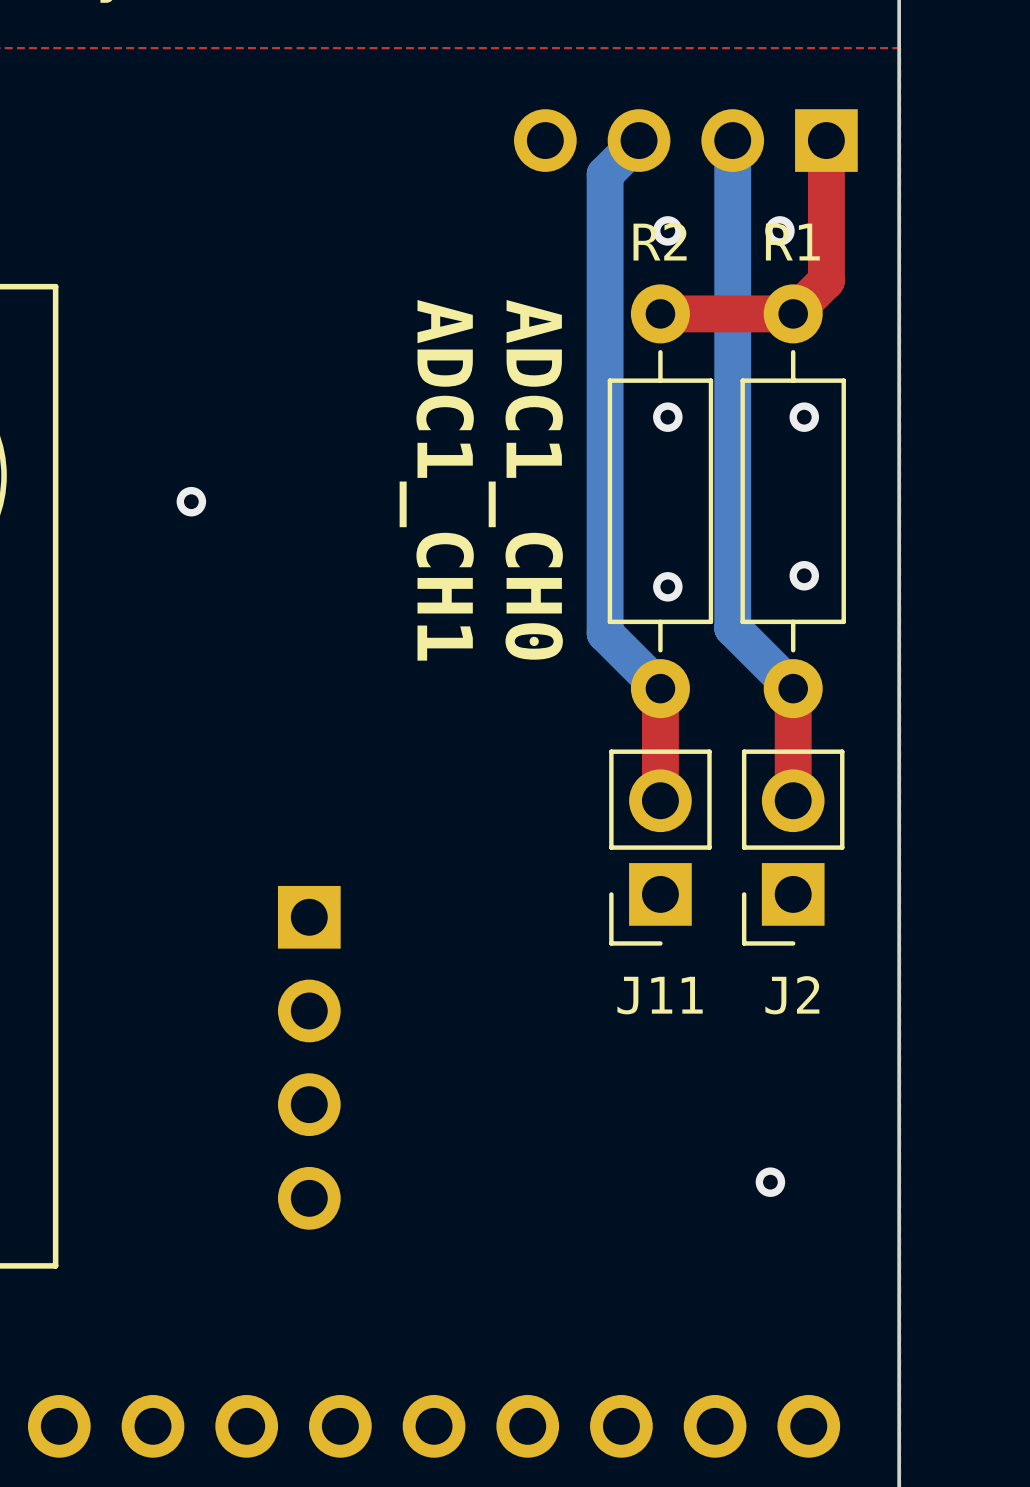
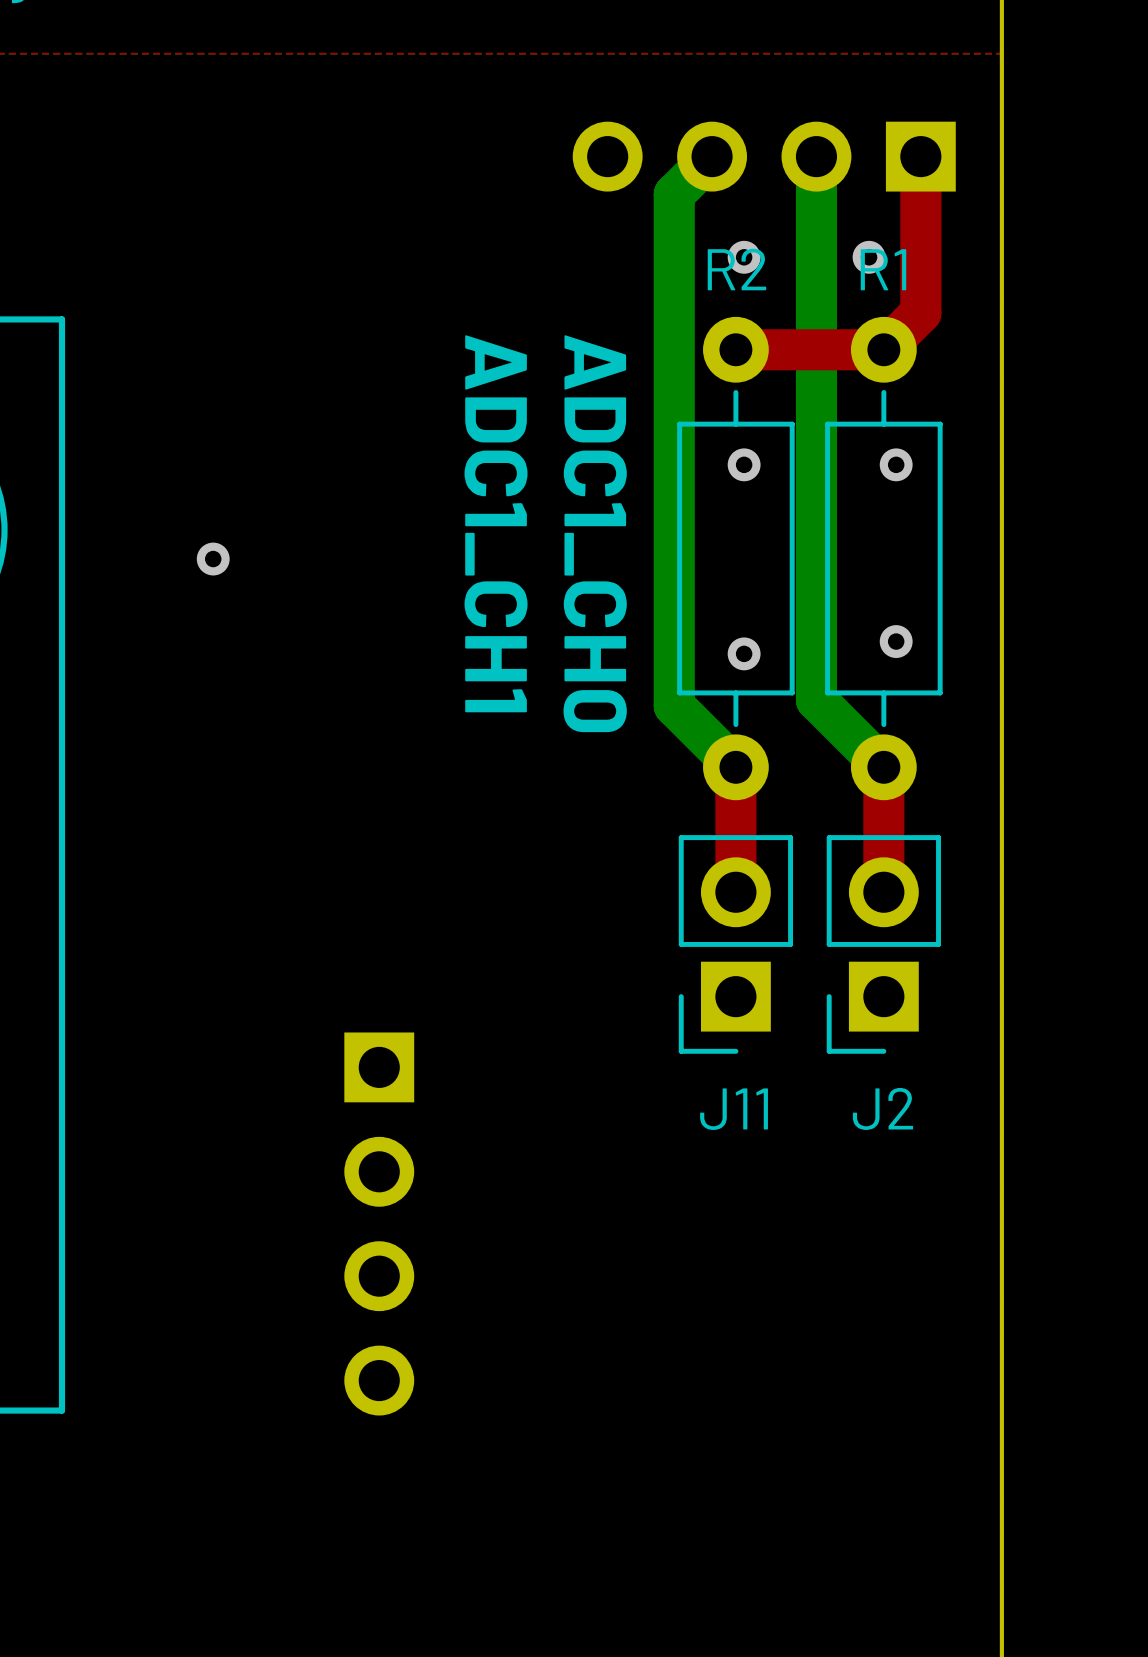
part position: (309, 1057) -> (379, 1223)
via: (770, 1182) -> none
part: (59, 1426) -> none
part: (153, 1426) -> none
part: (246, 1426) -> none
part: (340, 1426) -> none
part: (434, 1426) -> none
part: (527, 1426) -> none
part: (621, 1426) -> none
part: (715, 1426) -> none
part: (808, 1426) -> none

